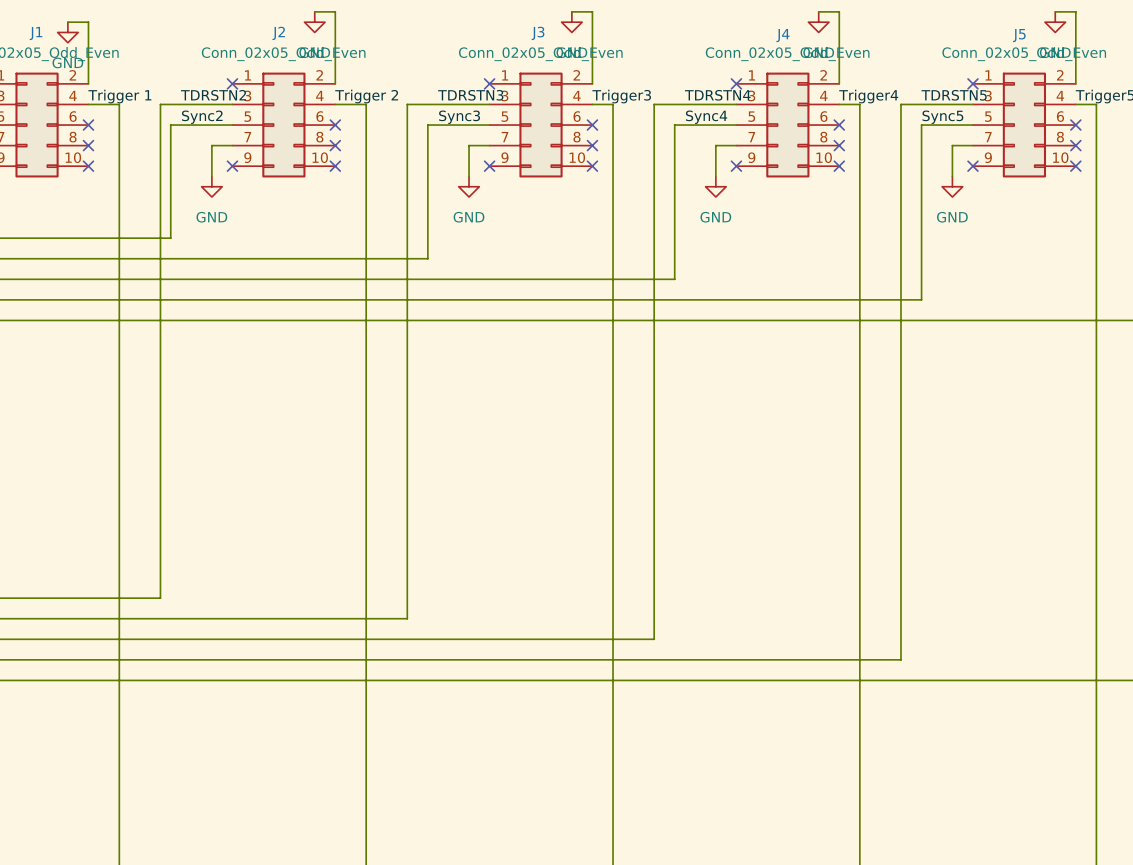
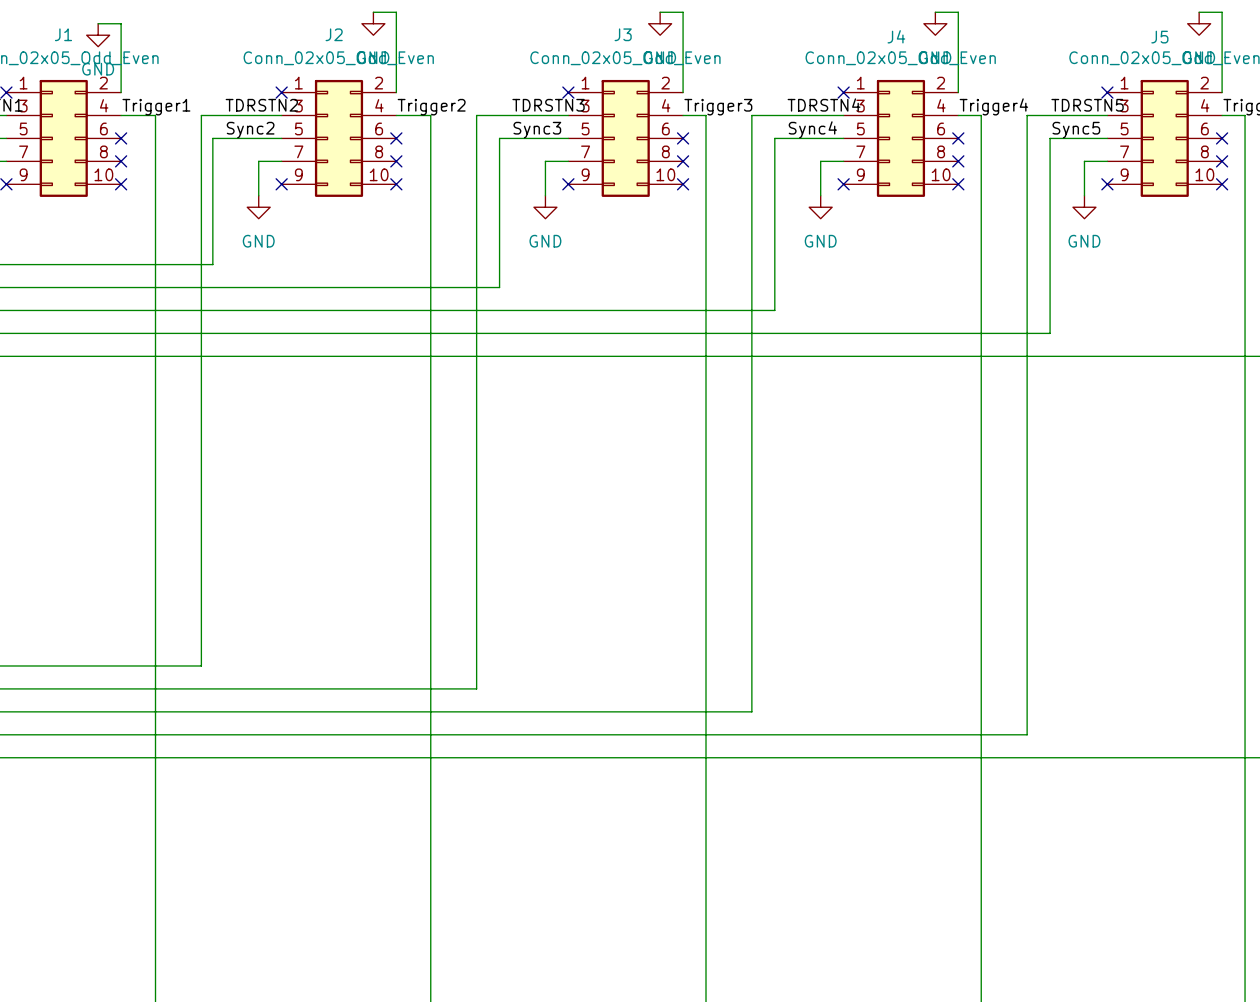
label: Trigger 1 (119, 96) -> Trigger1 (156, 107)
label: Trigger 2 (366, 96) -> Trigger2 (431, 107)

